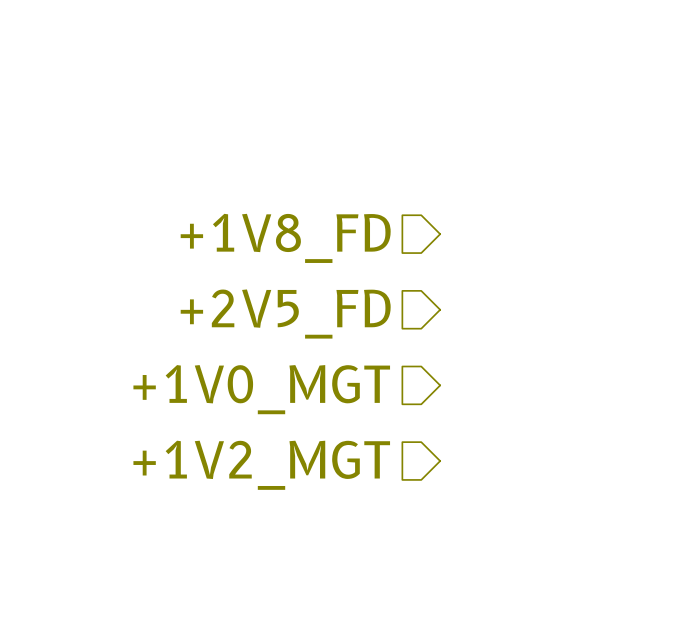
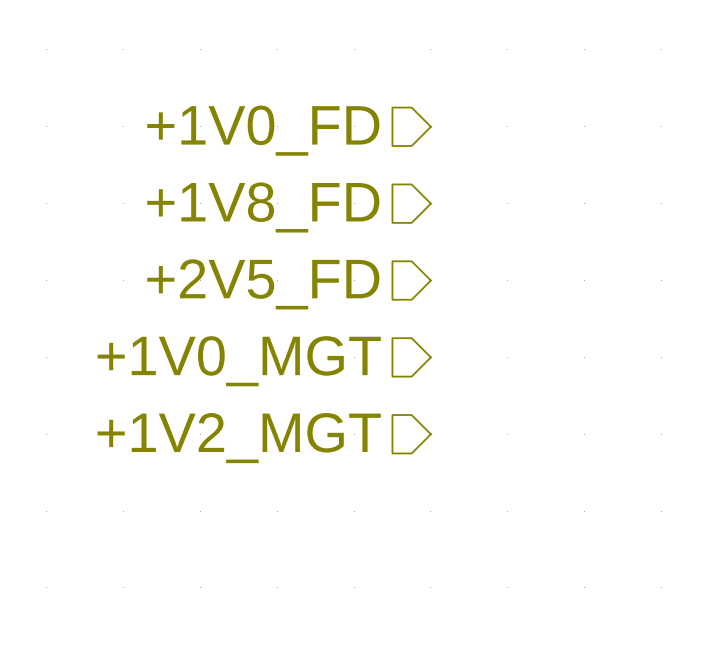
hierarchical label: none -> +1V0_FD (263, 130)

